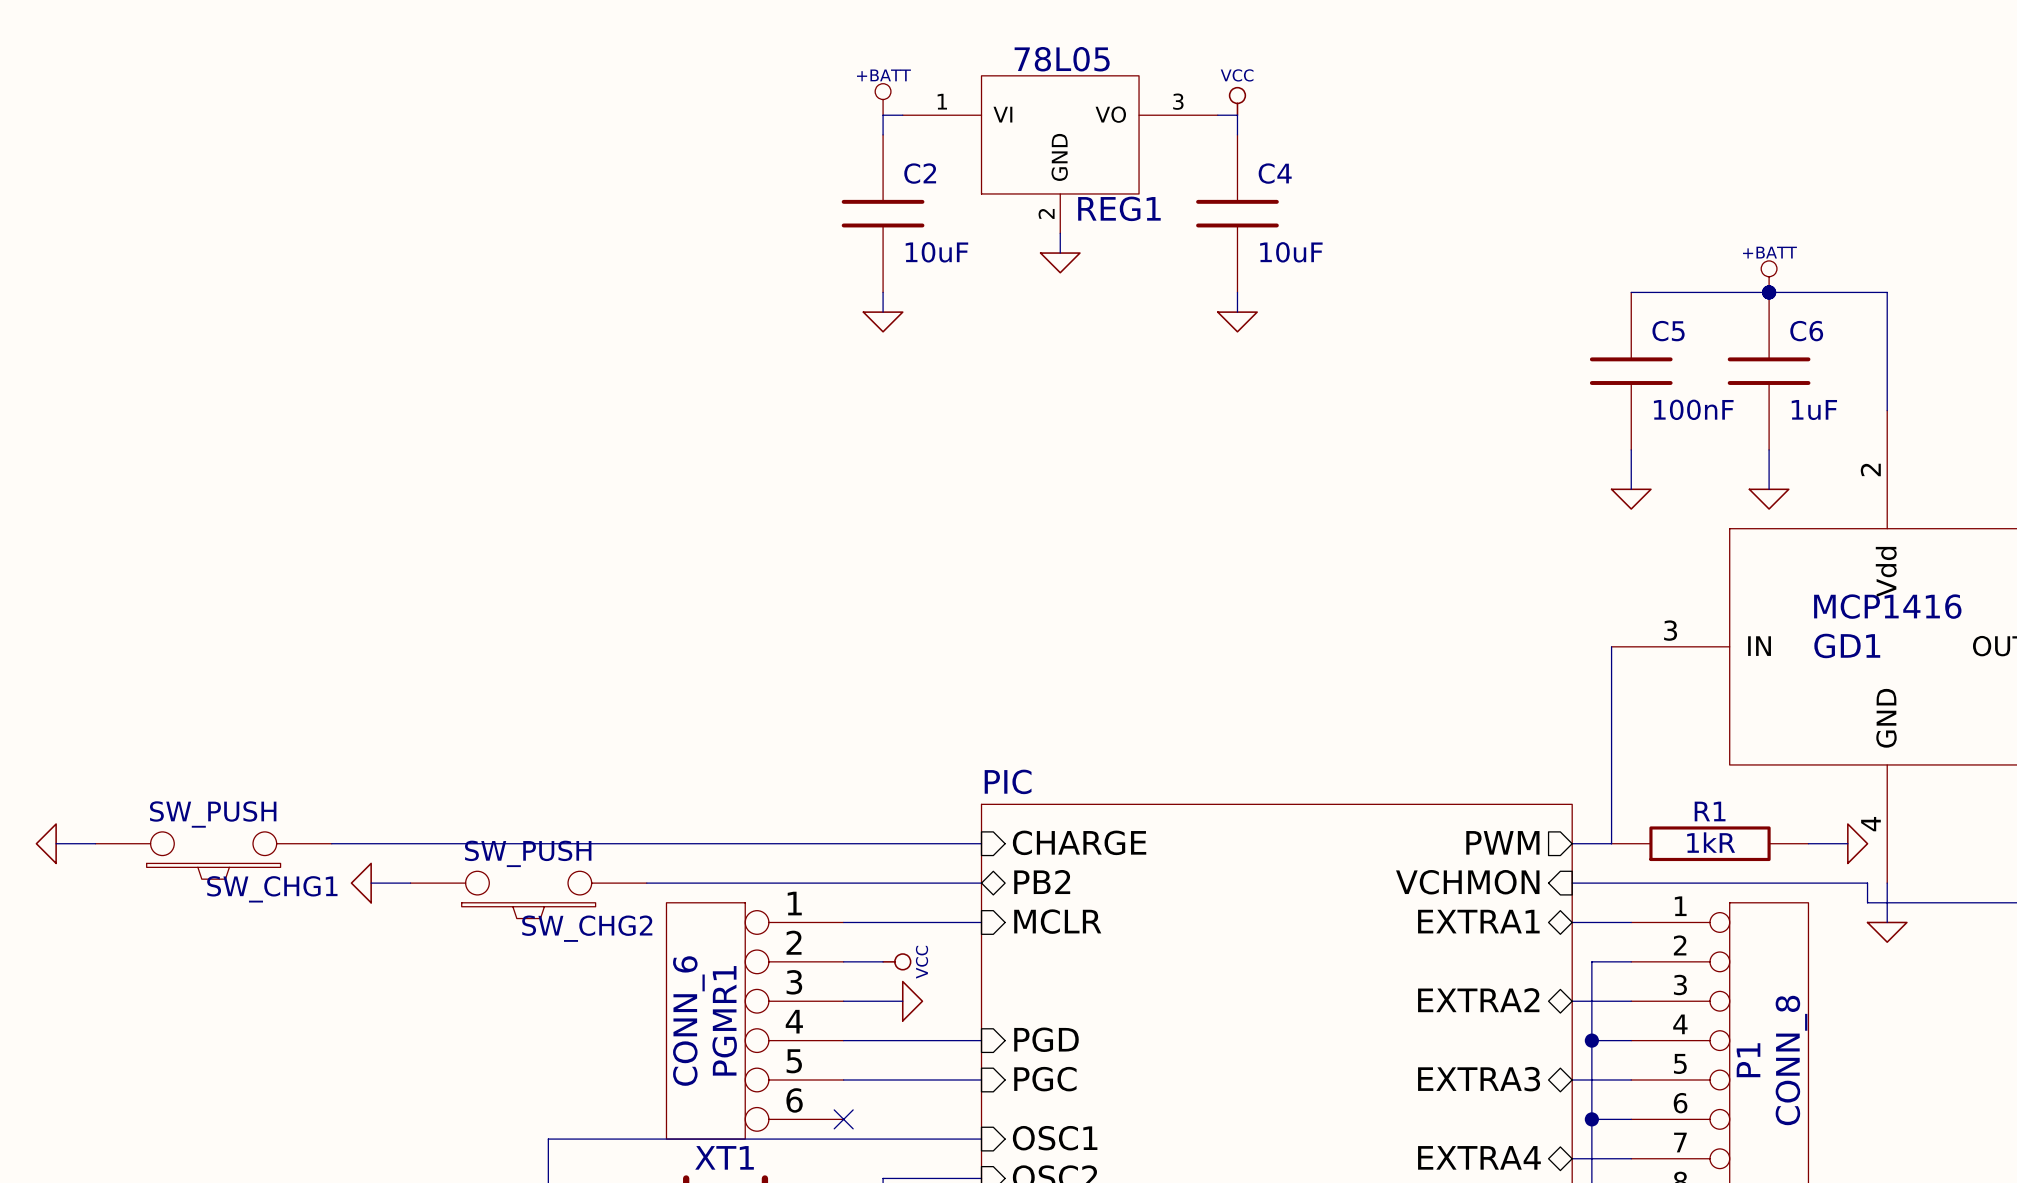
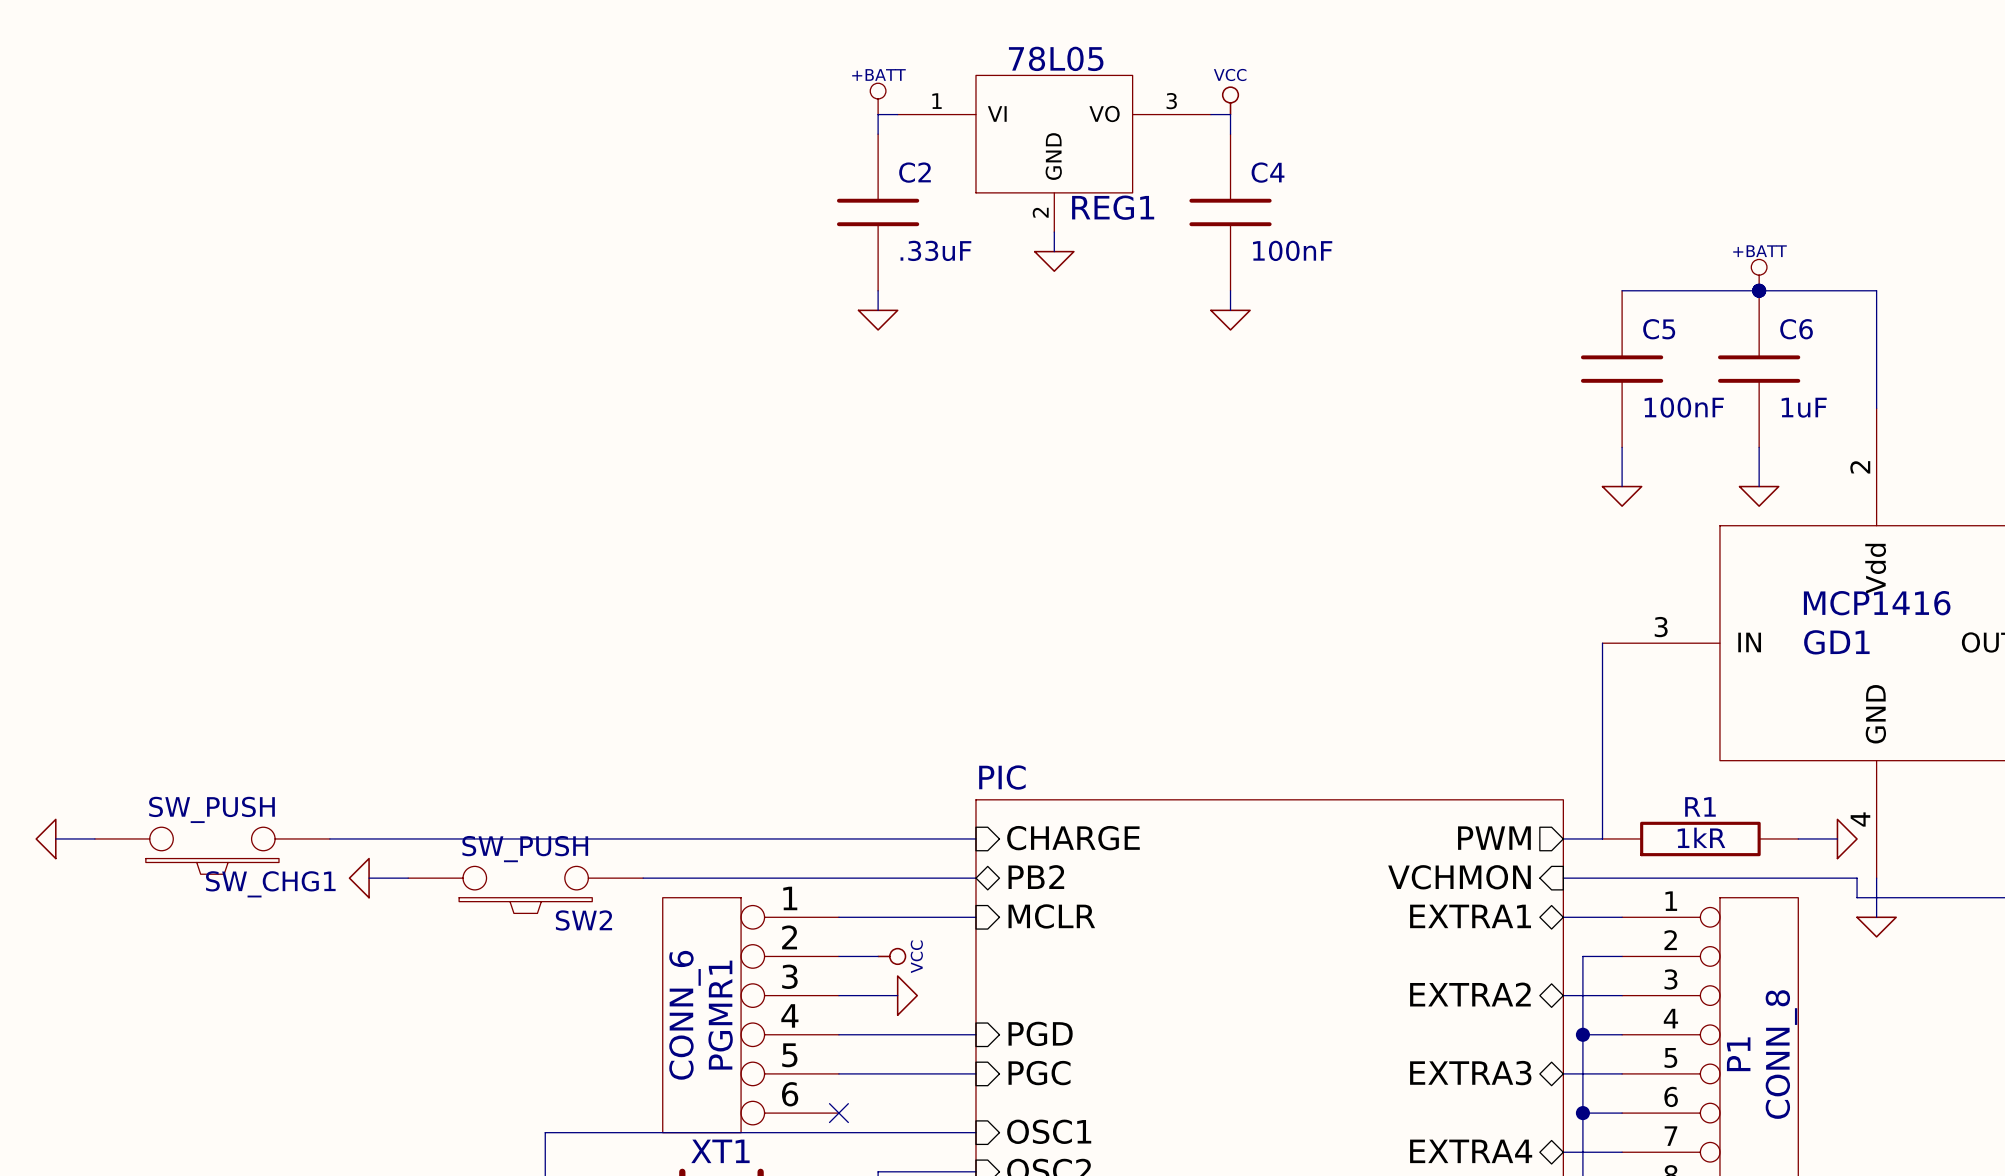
C2 value: 10uF (936, 252) -> .33uF (935, 250)
C4 value: 10uF (1291, 252) -> 100nF (1292, 250)
SW_CHG2 name: SW_CHG2 (587, 928) -> SW2 (583, 920)

